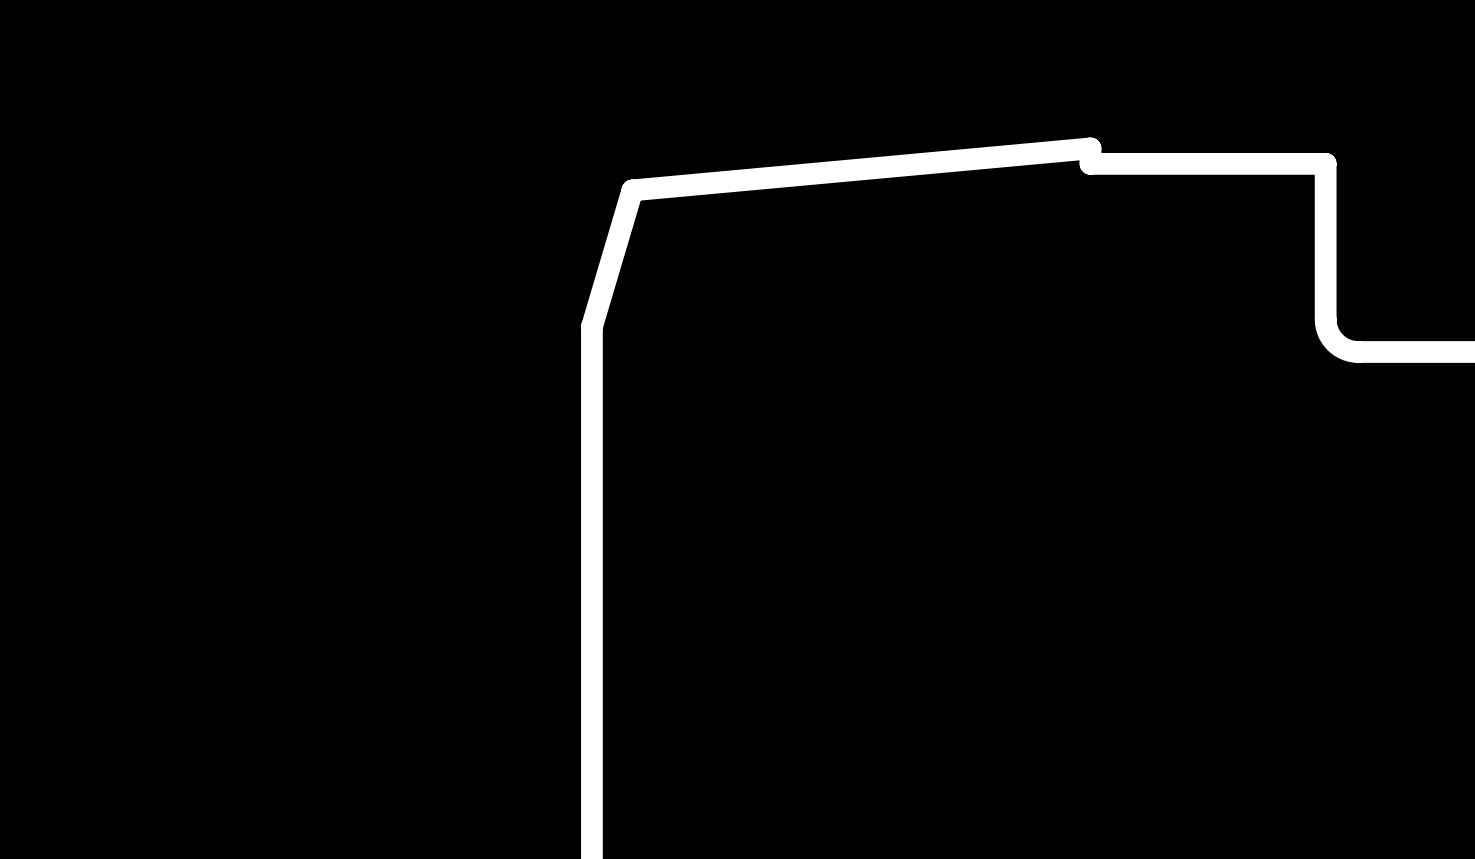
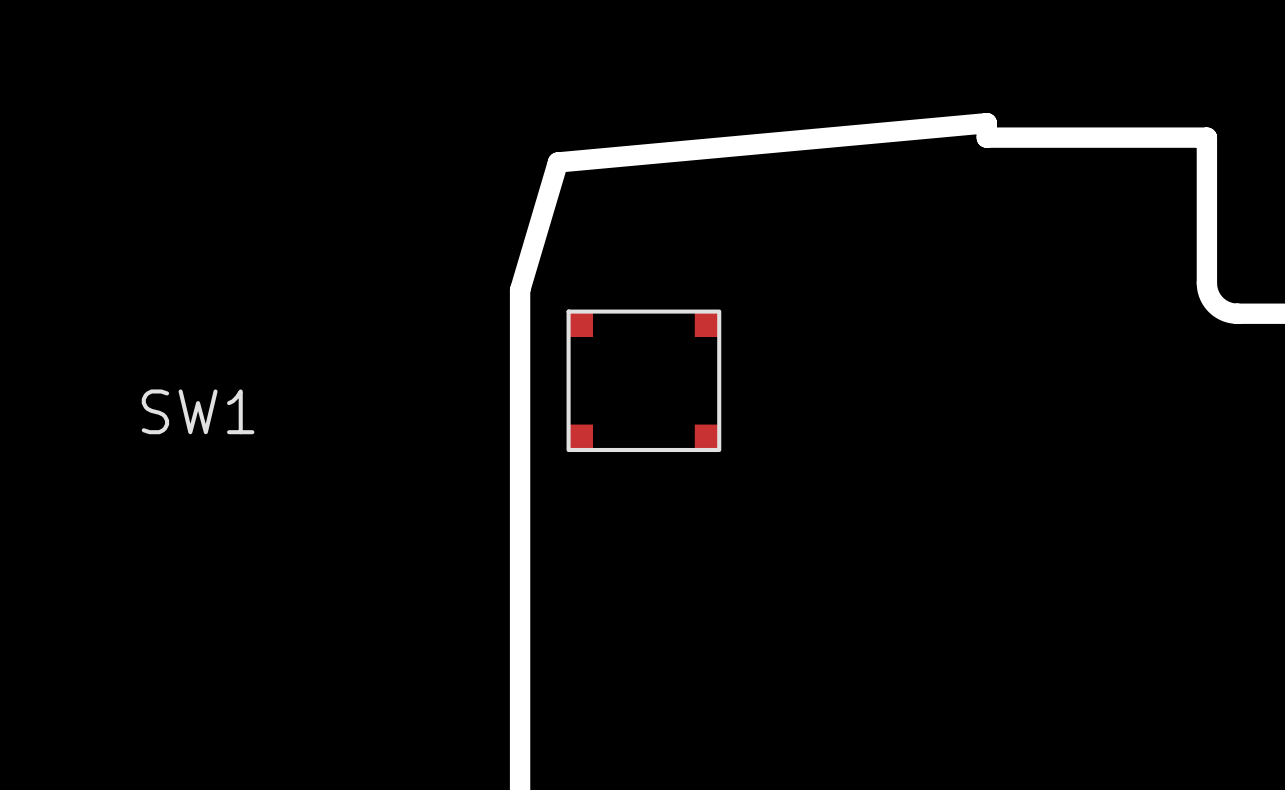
SW1: none -> (643, 380)

